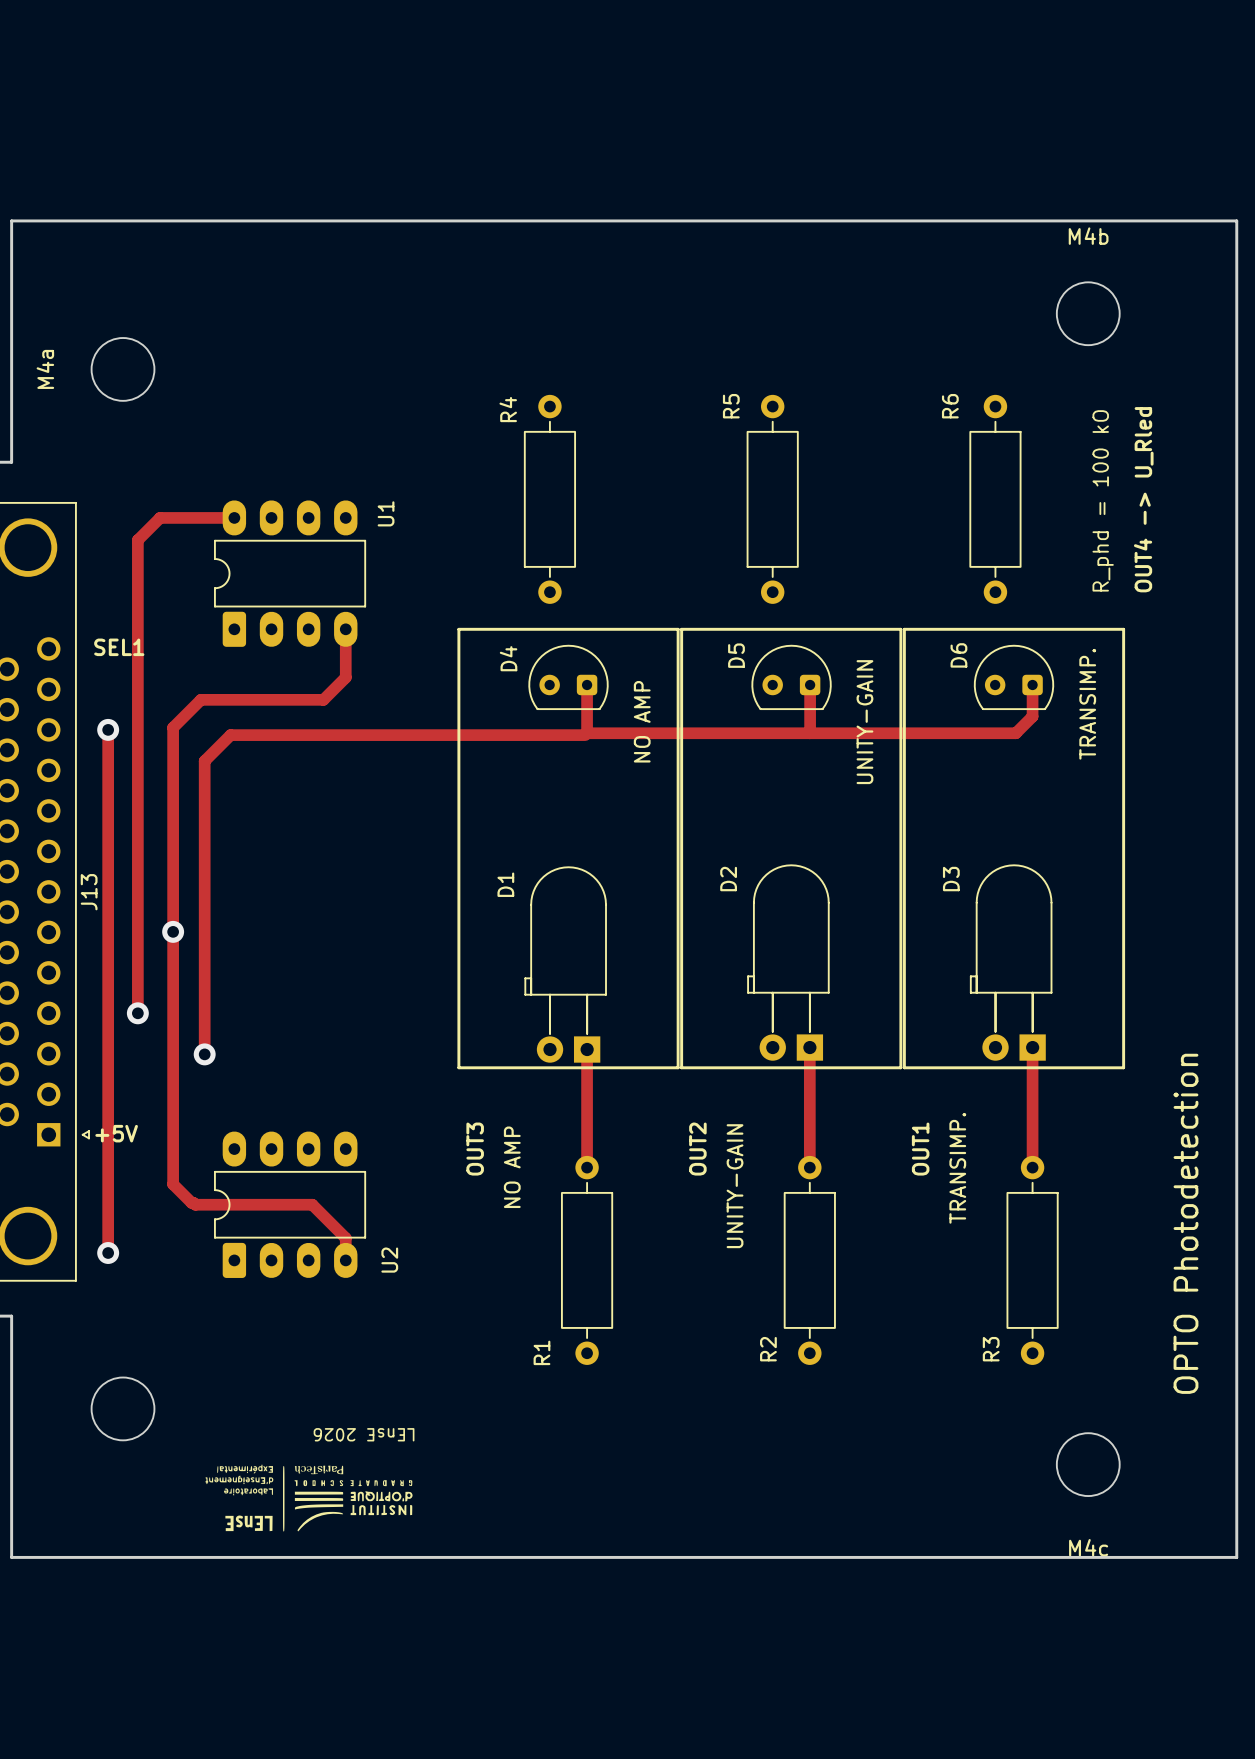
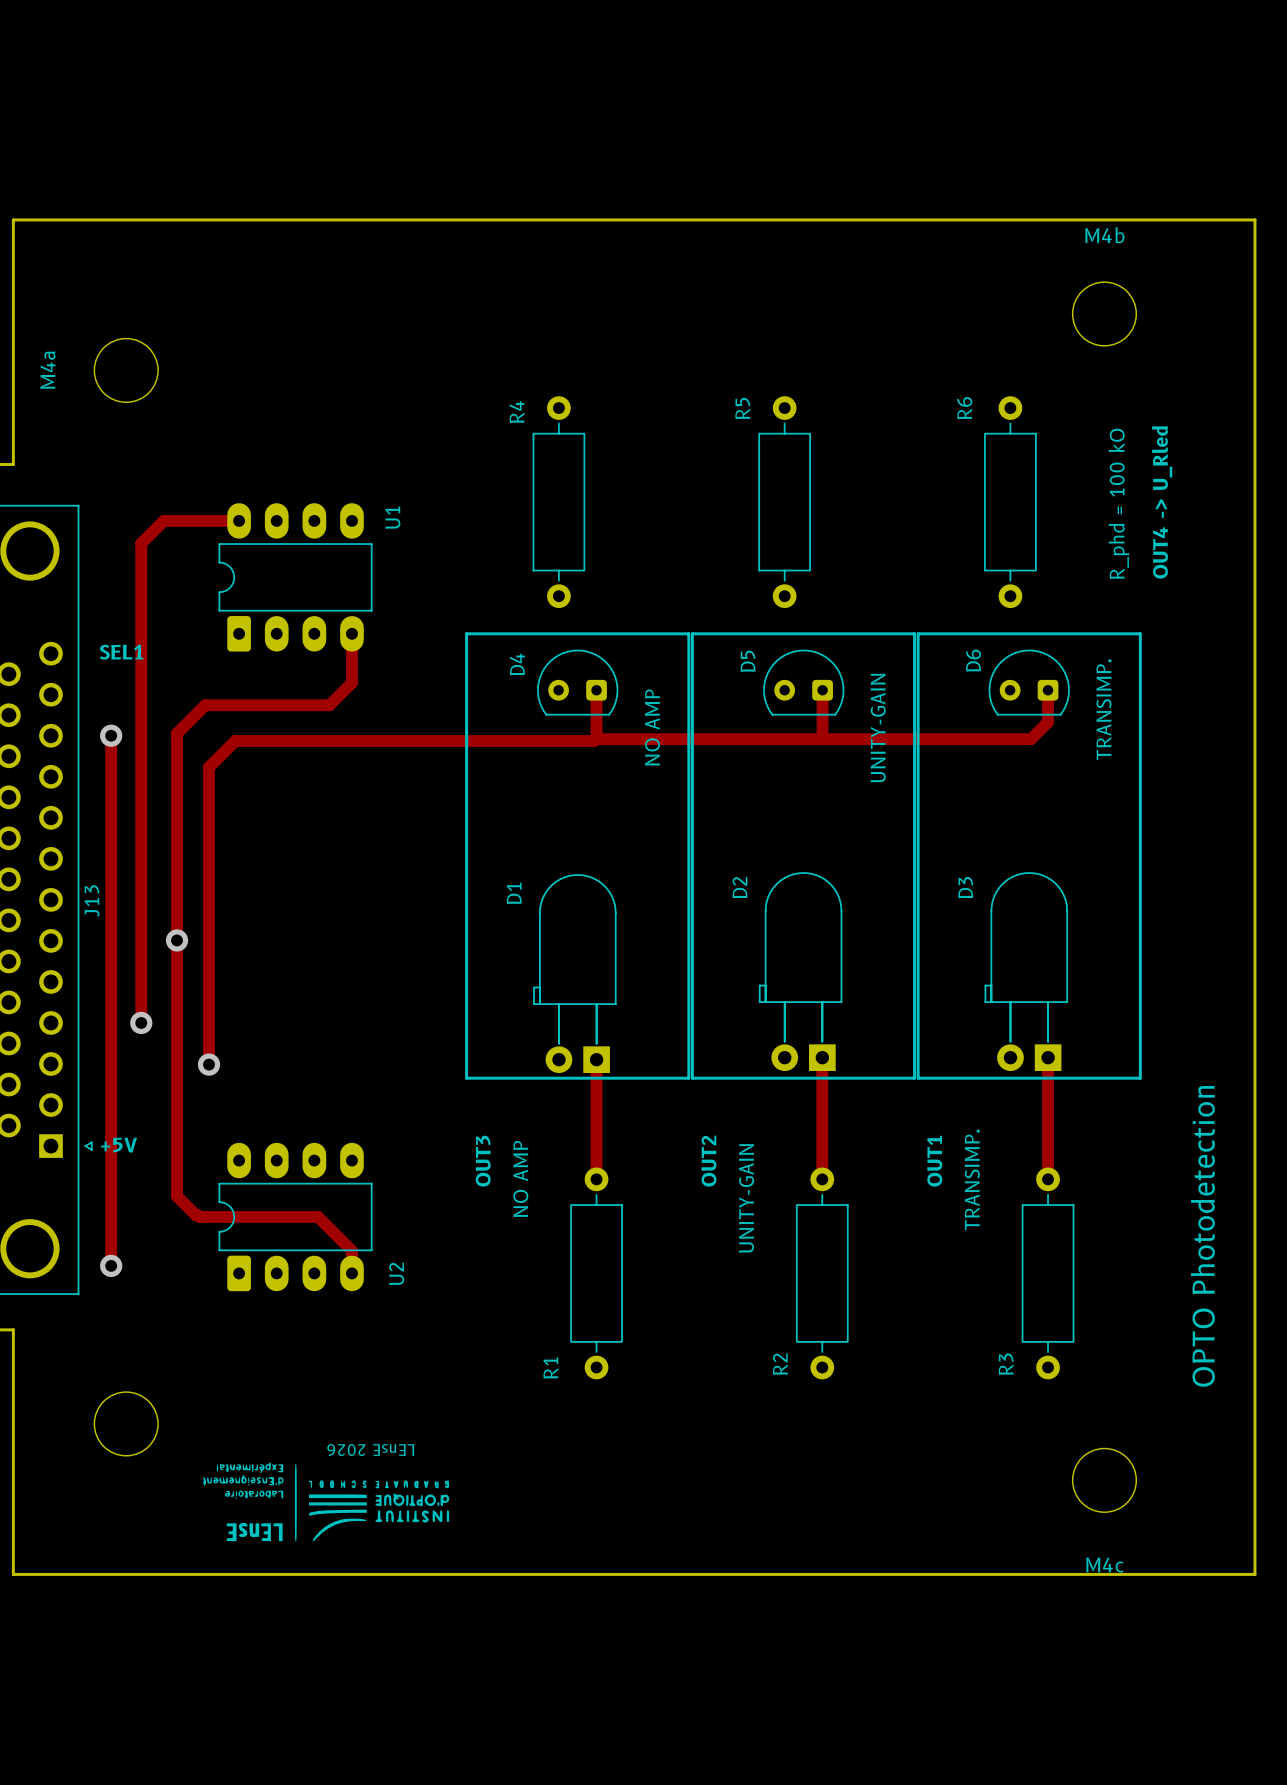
drawing: none -> [202, 1462, 450, 1542]
drawing: [205, 1464, 413, 1532] -> none

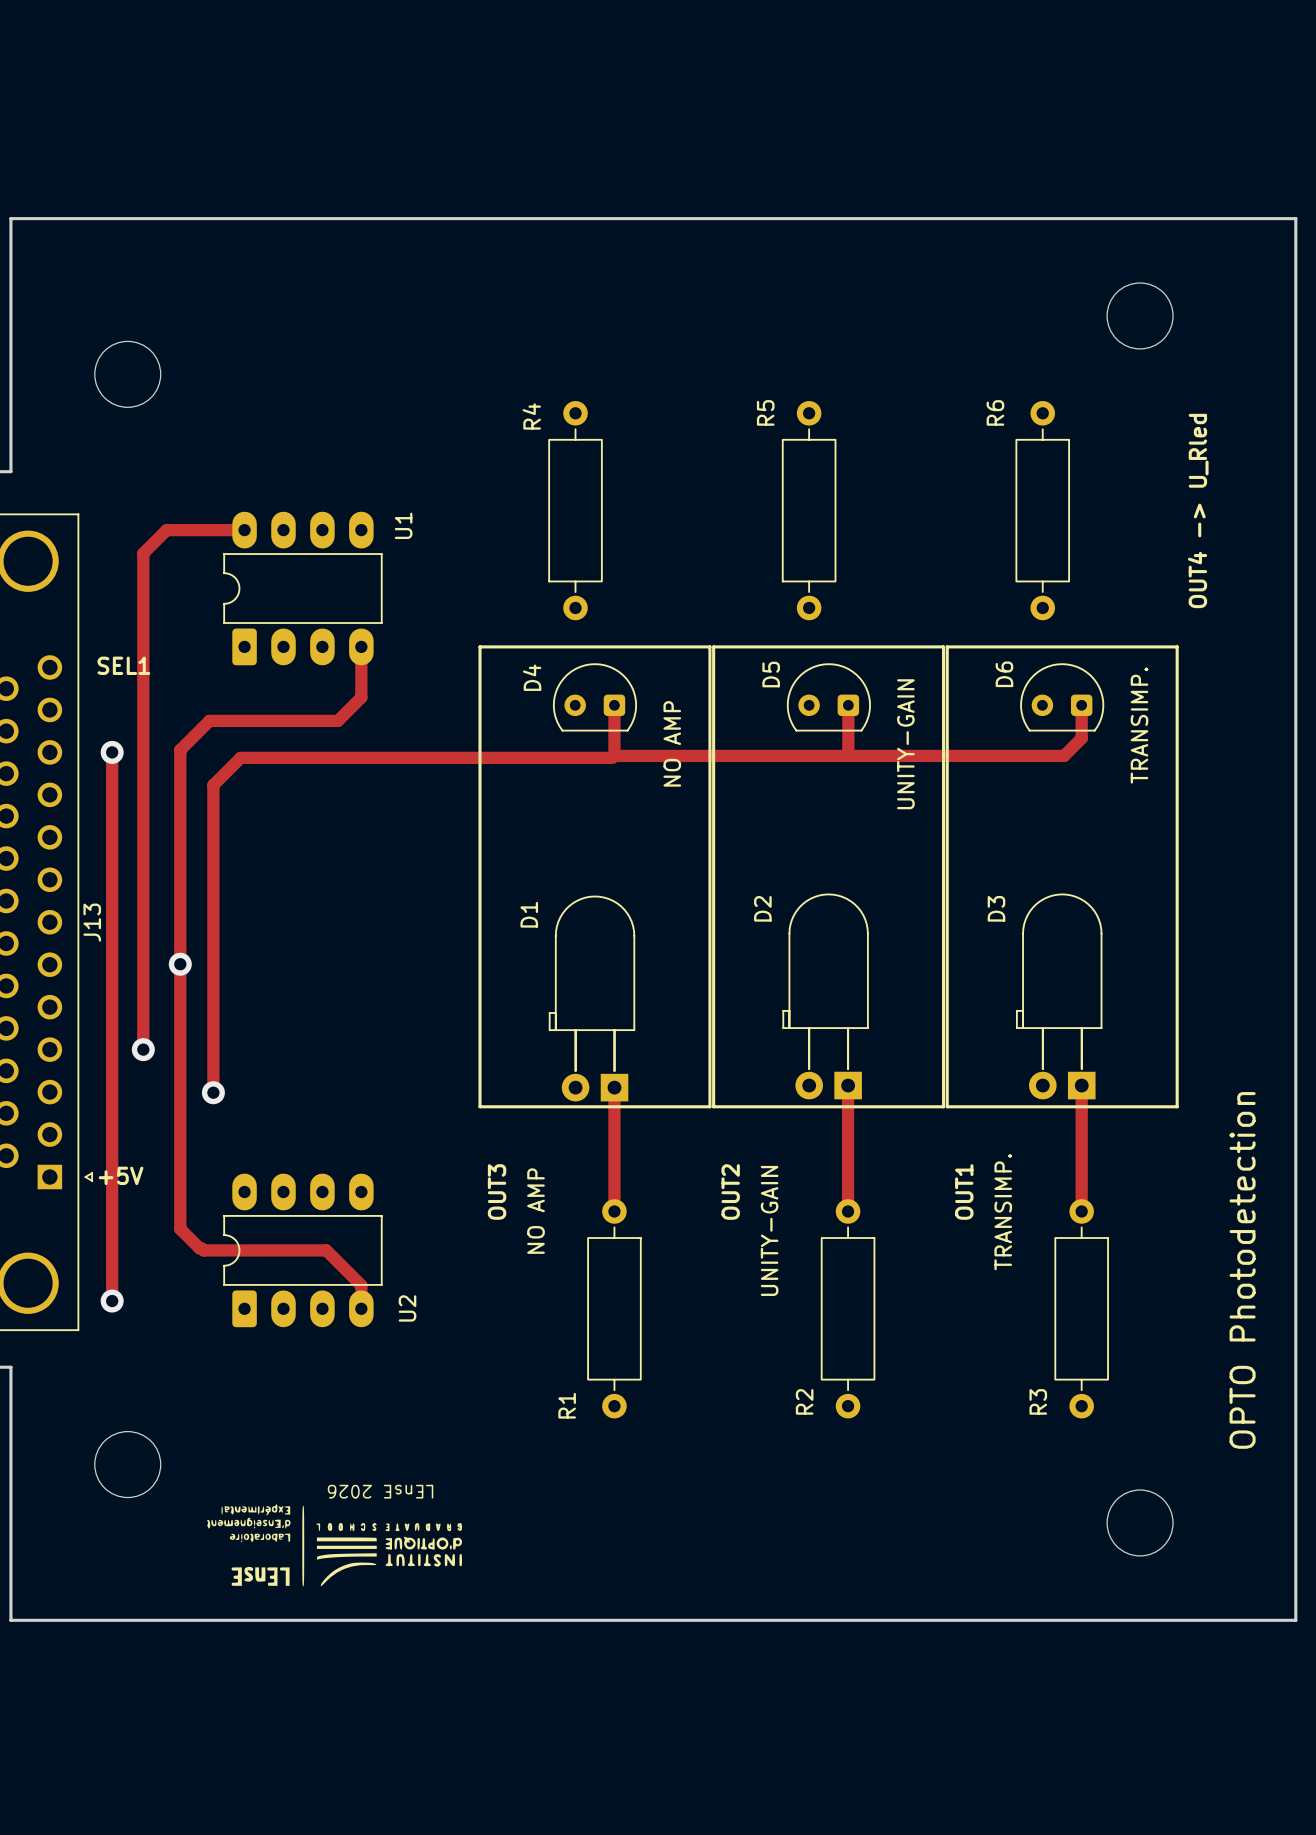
M4b name: M4b (1104, 235) -> none
M4a name: M4a (47, 370) -> none
text: R_phd = 100 kO (1119, 503) -> none
M4c name: M4c (1104, 1565) -> none

